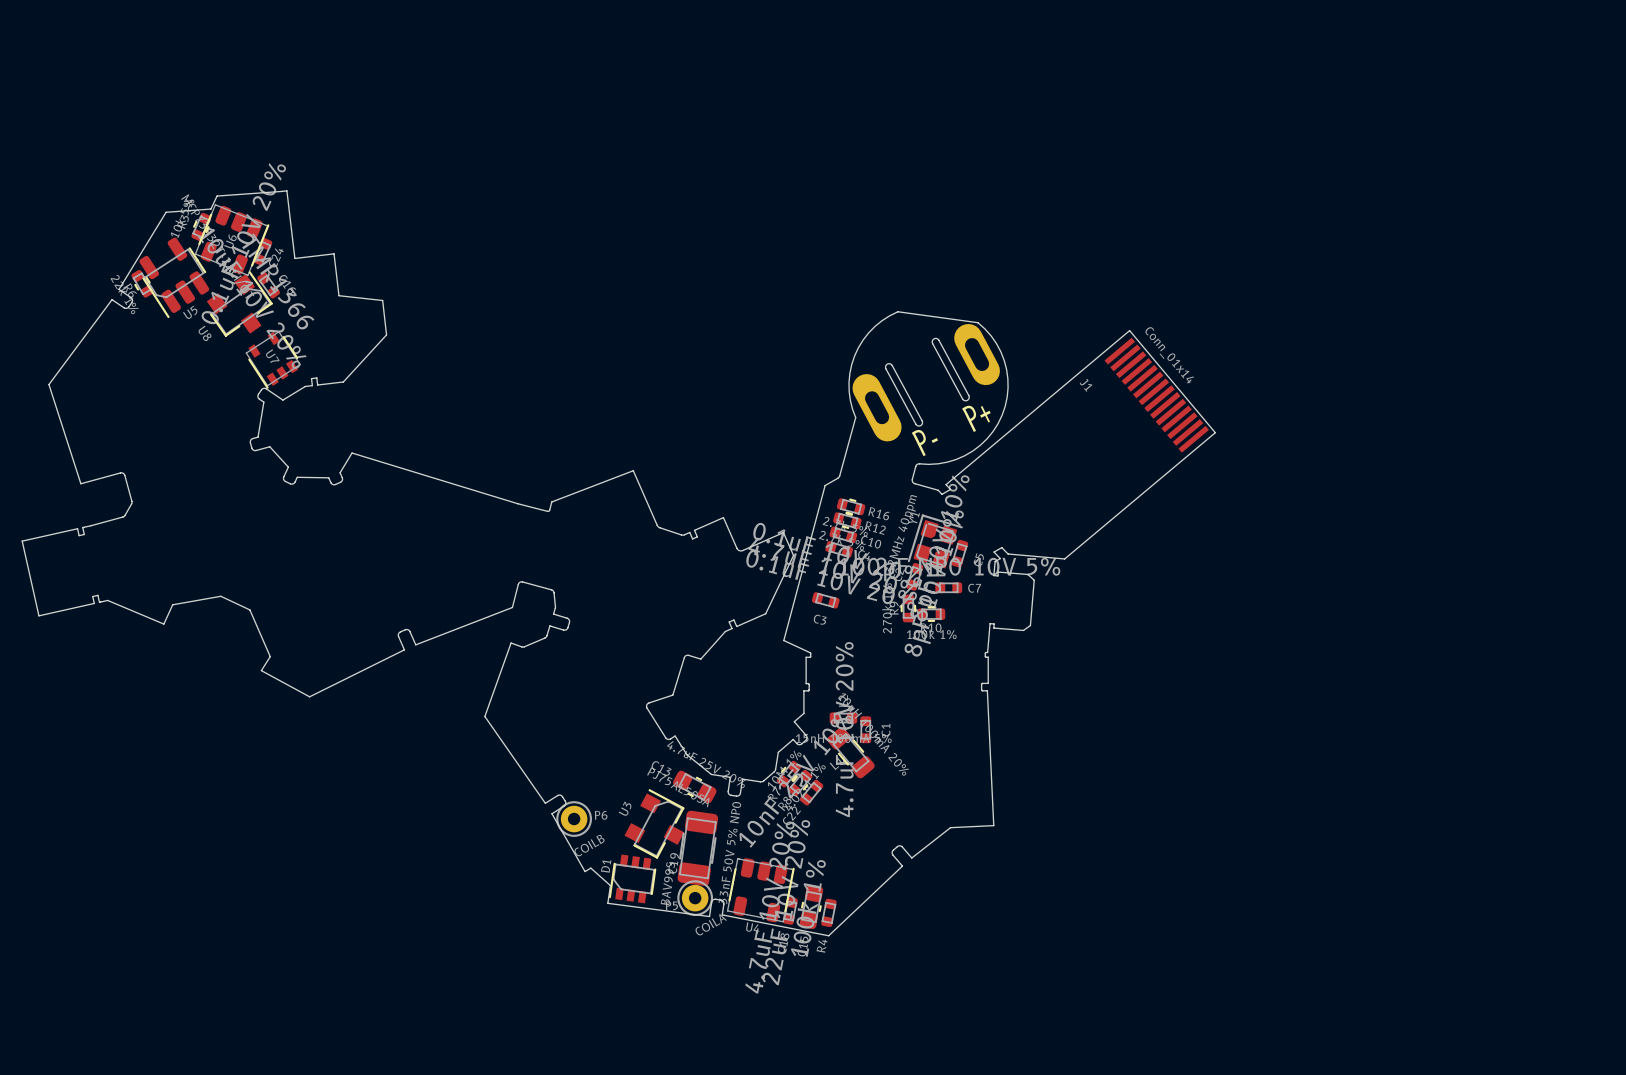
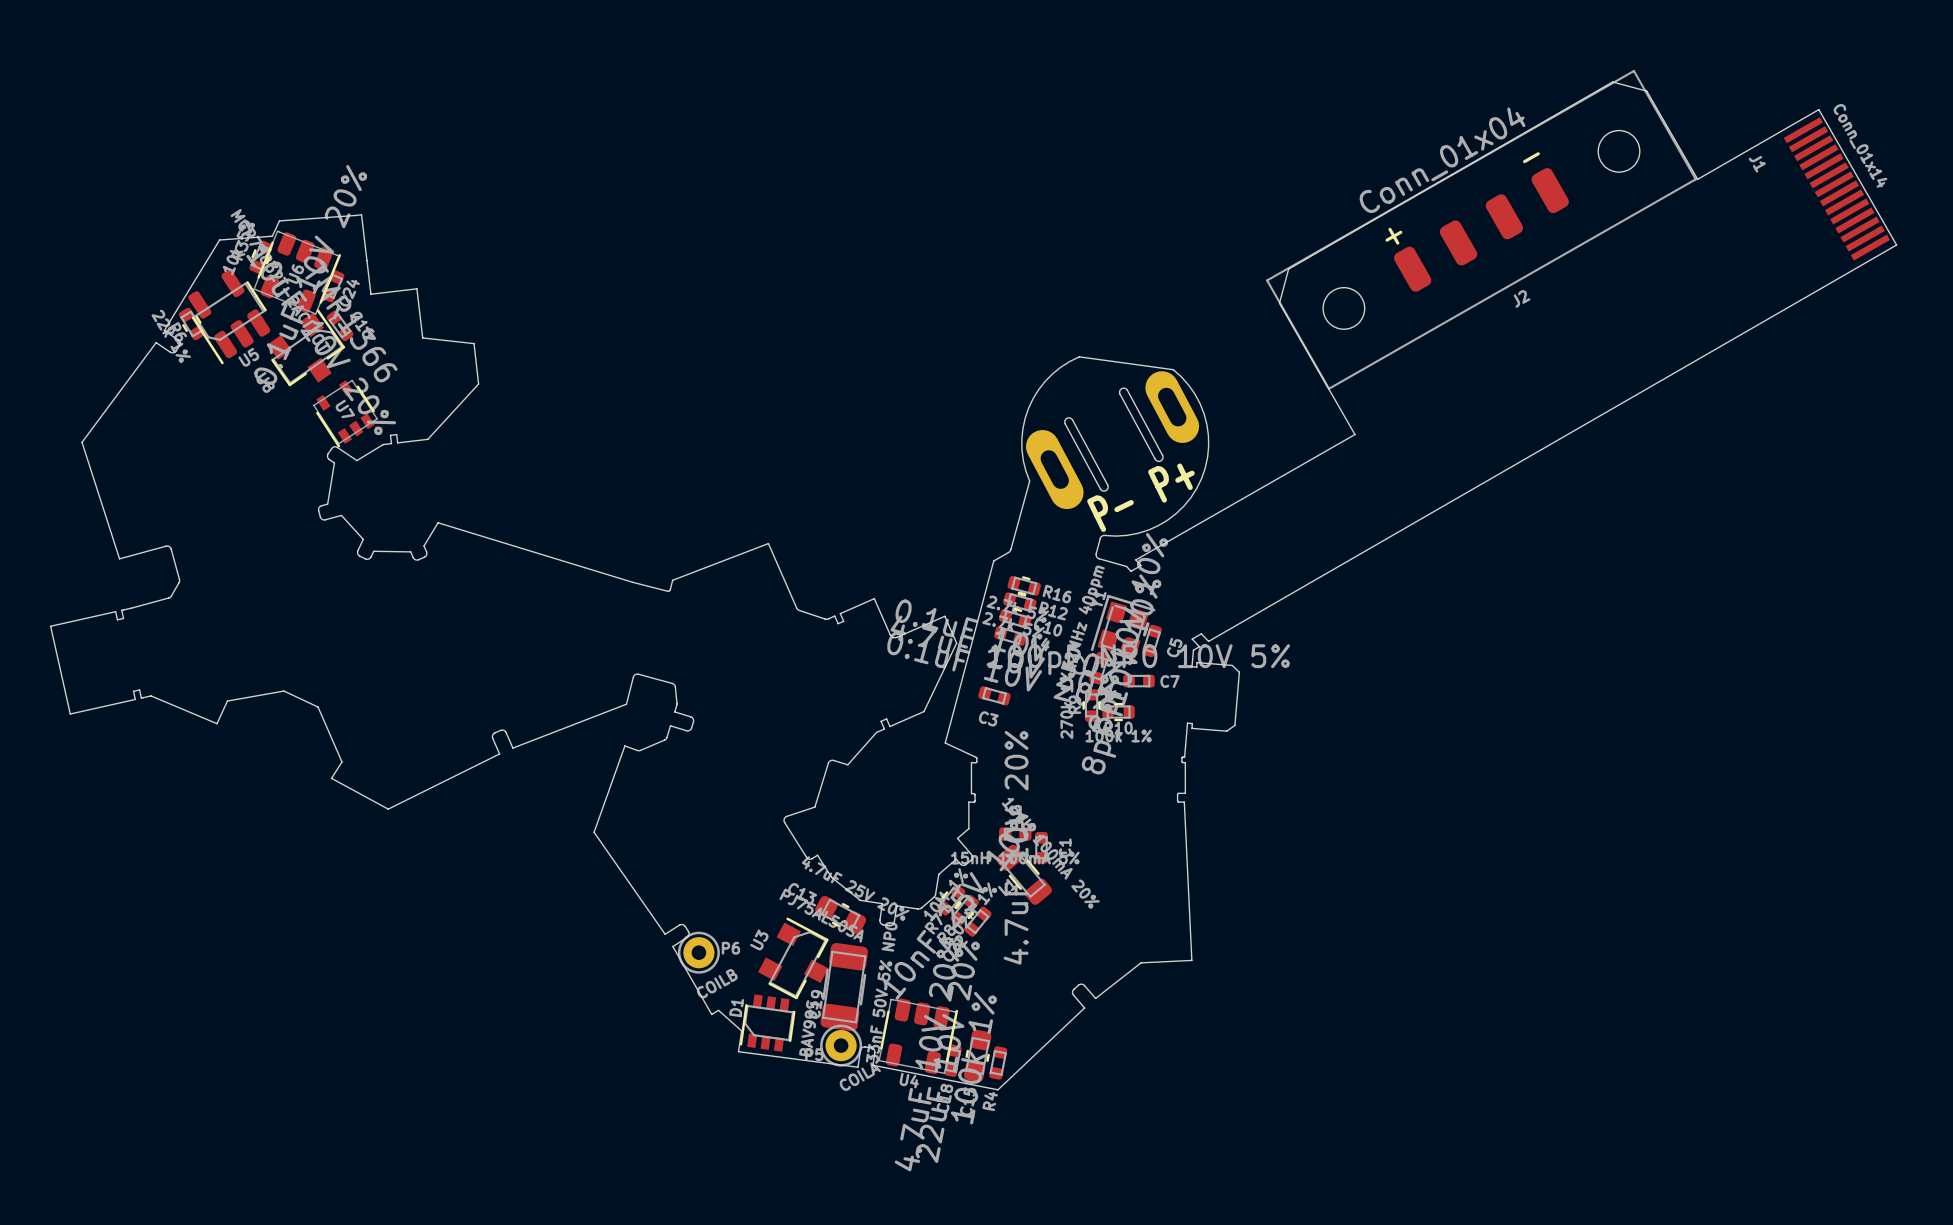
J2: none -> Conn_01x04 (1481, 229)
J1 rotation: 0° (1156, 395) -> 10.3° clockwise (1836, 188)
J1 position: (1156, 395) -> (1836, 188)
board edge: (946, 484) (1129, 330) (1215, 432) (1064, 558) (1008, 554) -> (1135, 559) (1354, 434) (1279, 303) (1288, 269) (1612, 82) (1646, 91) (1697, 179) (1818, 109) (1896, 245) (1208, 641)

